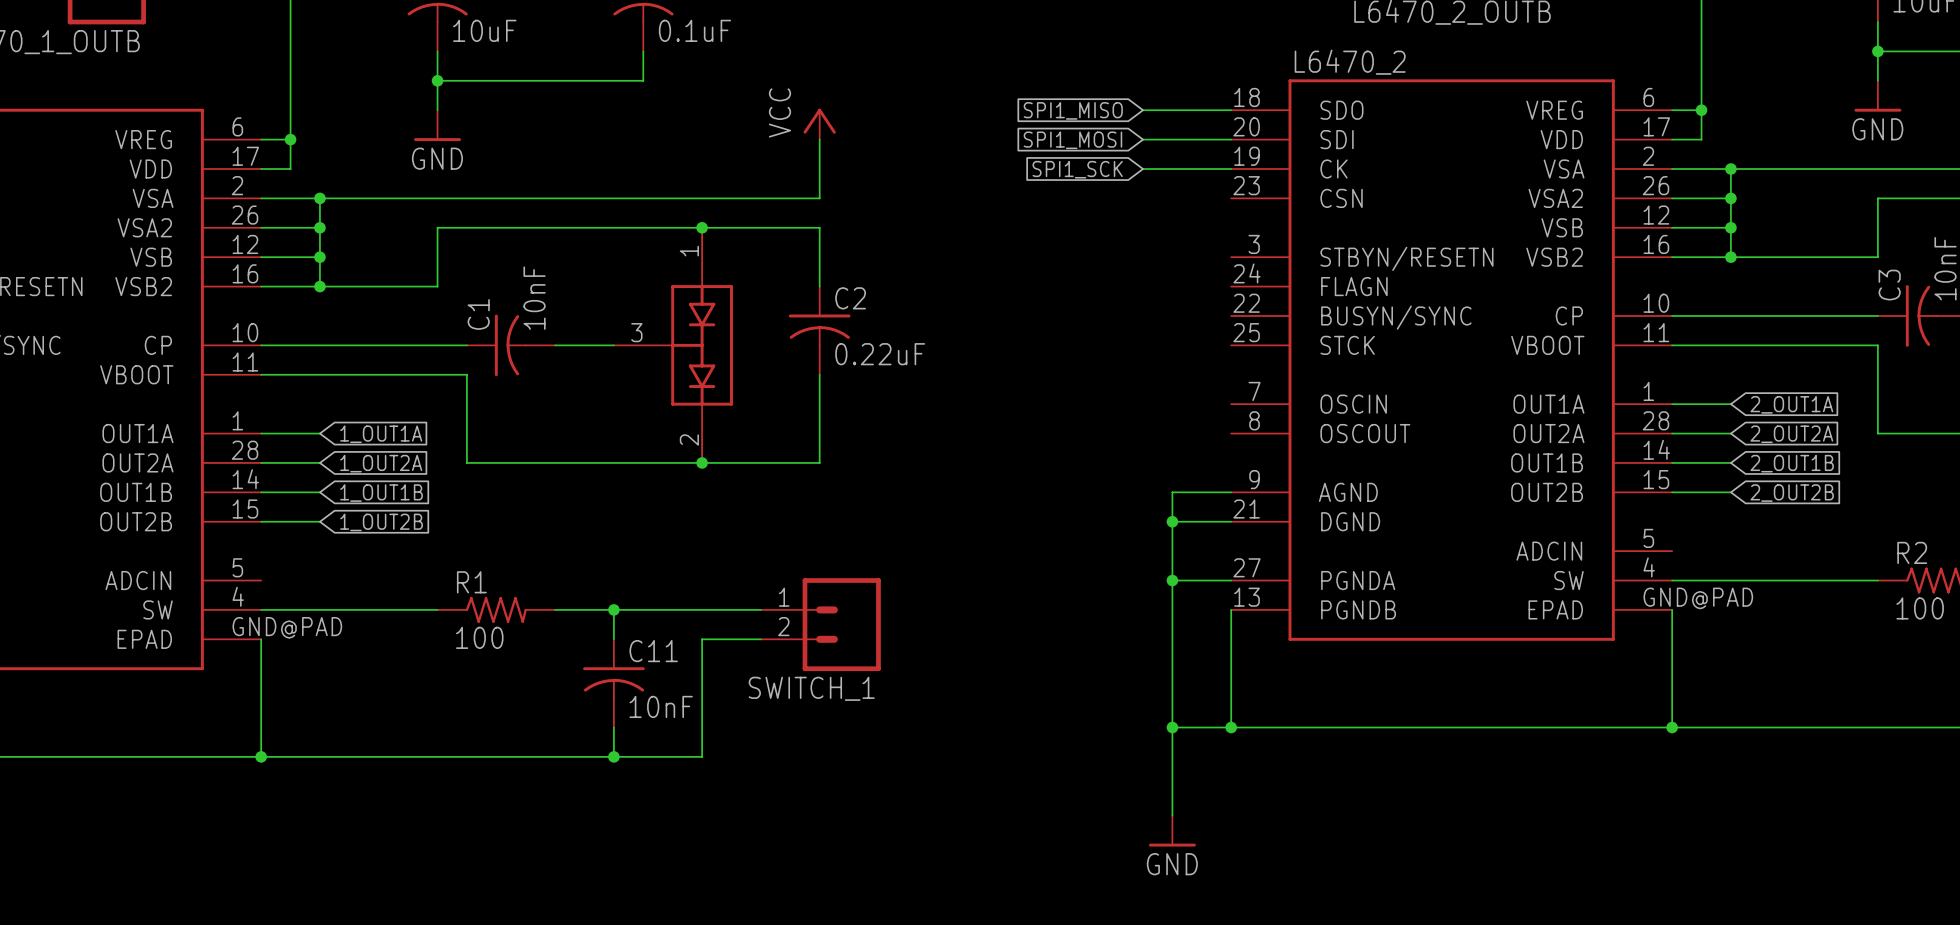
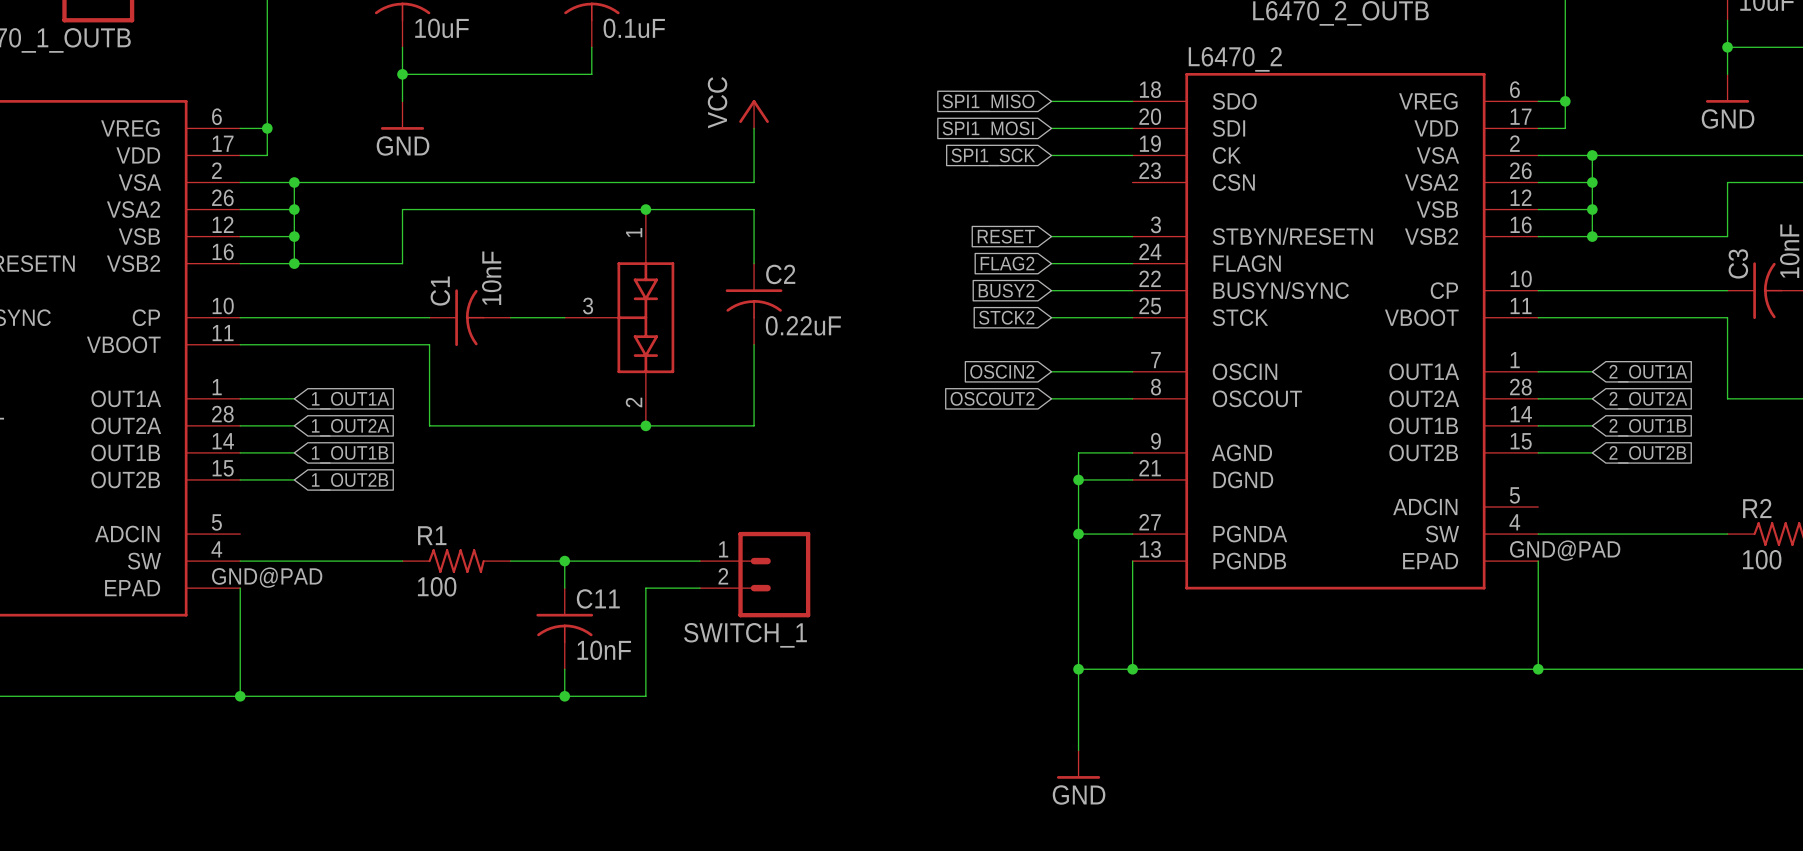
global label: none -> RESET (1006, 236)
wire: none -> (1051, 236) (1132, 236)
global label: none -> FLAG2 (1007, 263)
wire: none -> (1051, 263) (1132, 263)
global label: none -> BUSY2 (1006, 290)
wire: none -> (1051, 290) (1132, 290)
global label: none -> STCK2 (1006, 317)
wire: none -> (1051, 317) (1132, 317)
global label: none -> OSCIN2 (1002, 371)
wire: none -> (1051, 371) (1132, 371)
global label: none -> OSCOUT2 (992, 398)
wire: none -> (1051, 398) (1132, 398)

